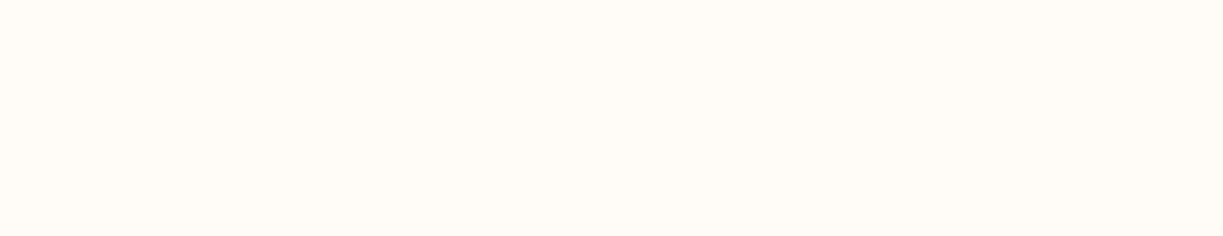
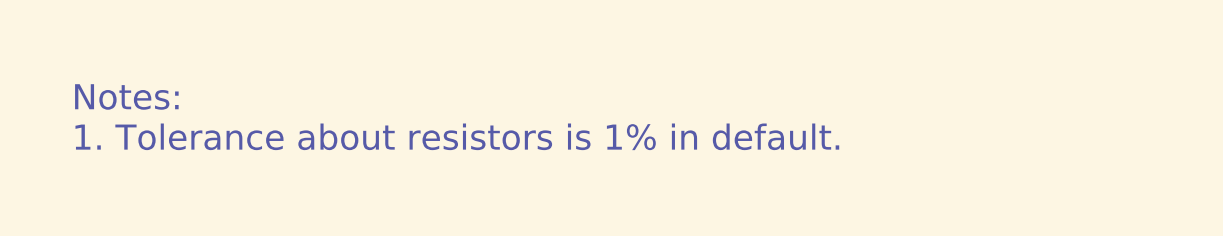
text: none -> Notes: (126, 96)
text: none -> 1. Tolerance about resistors is 1% in default. (457, 136)

